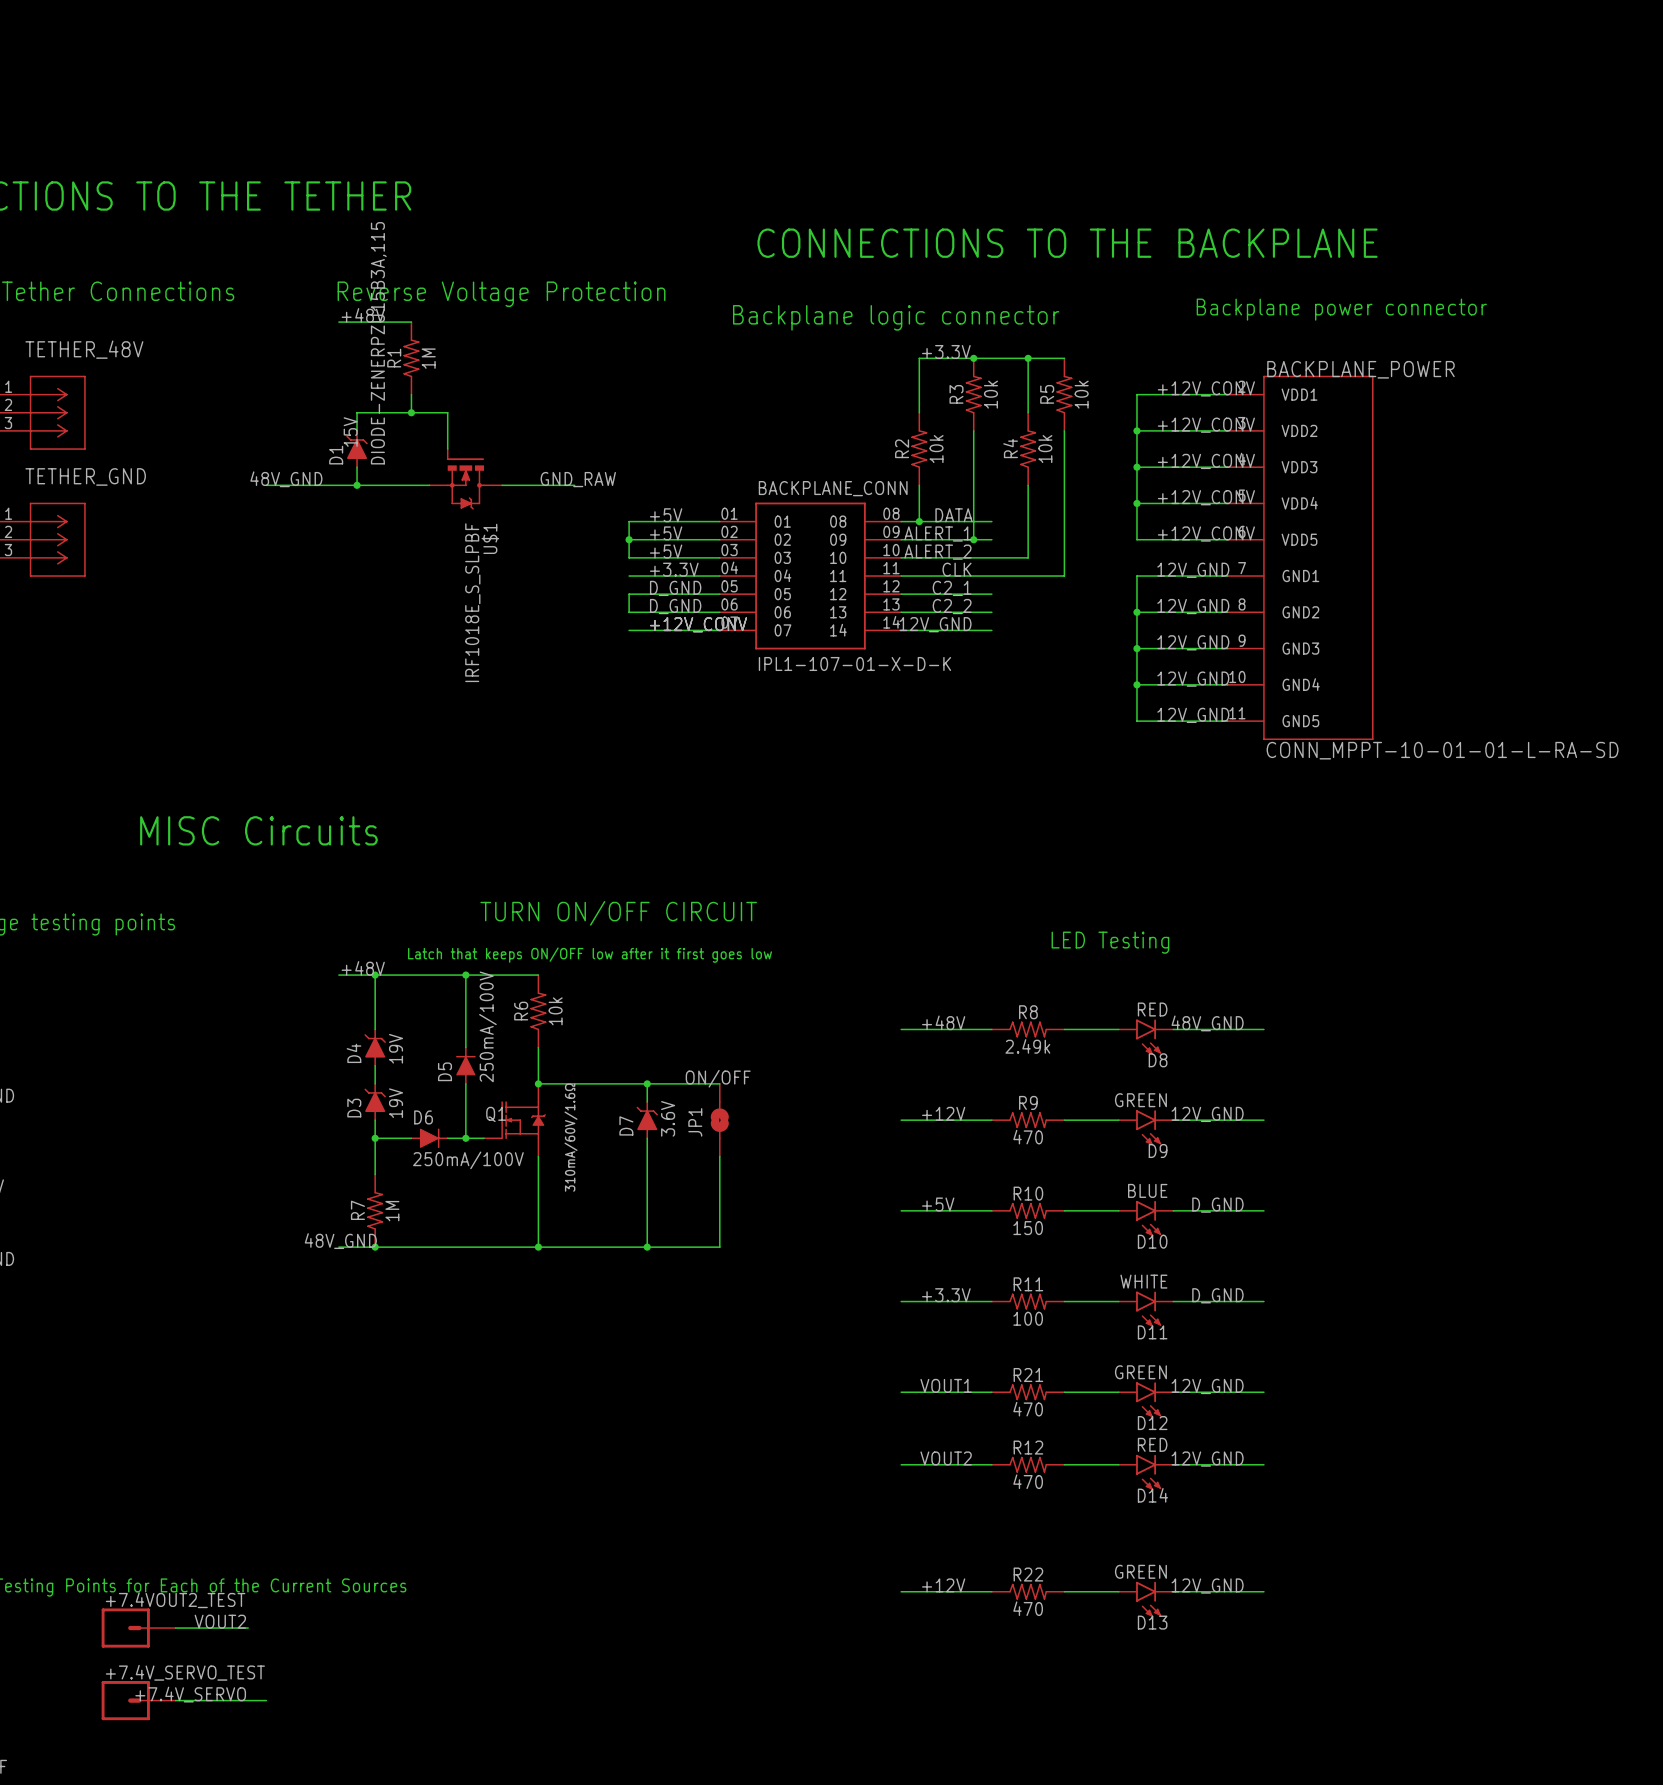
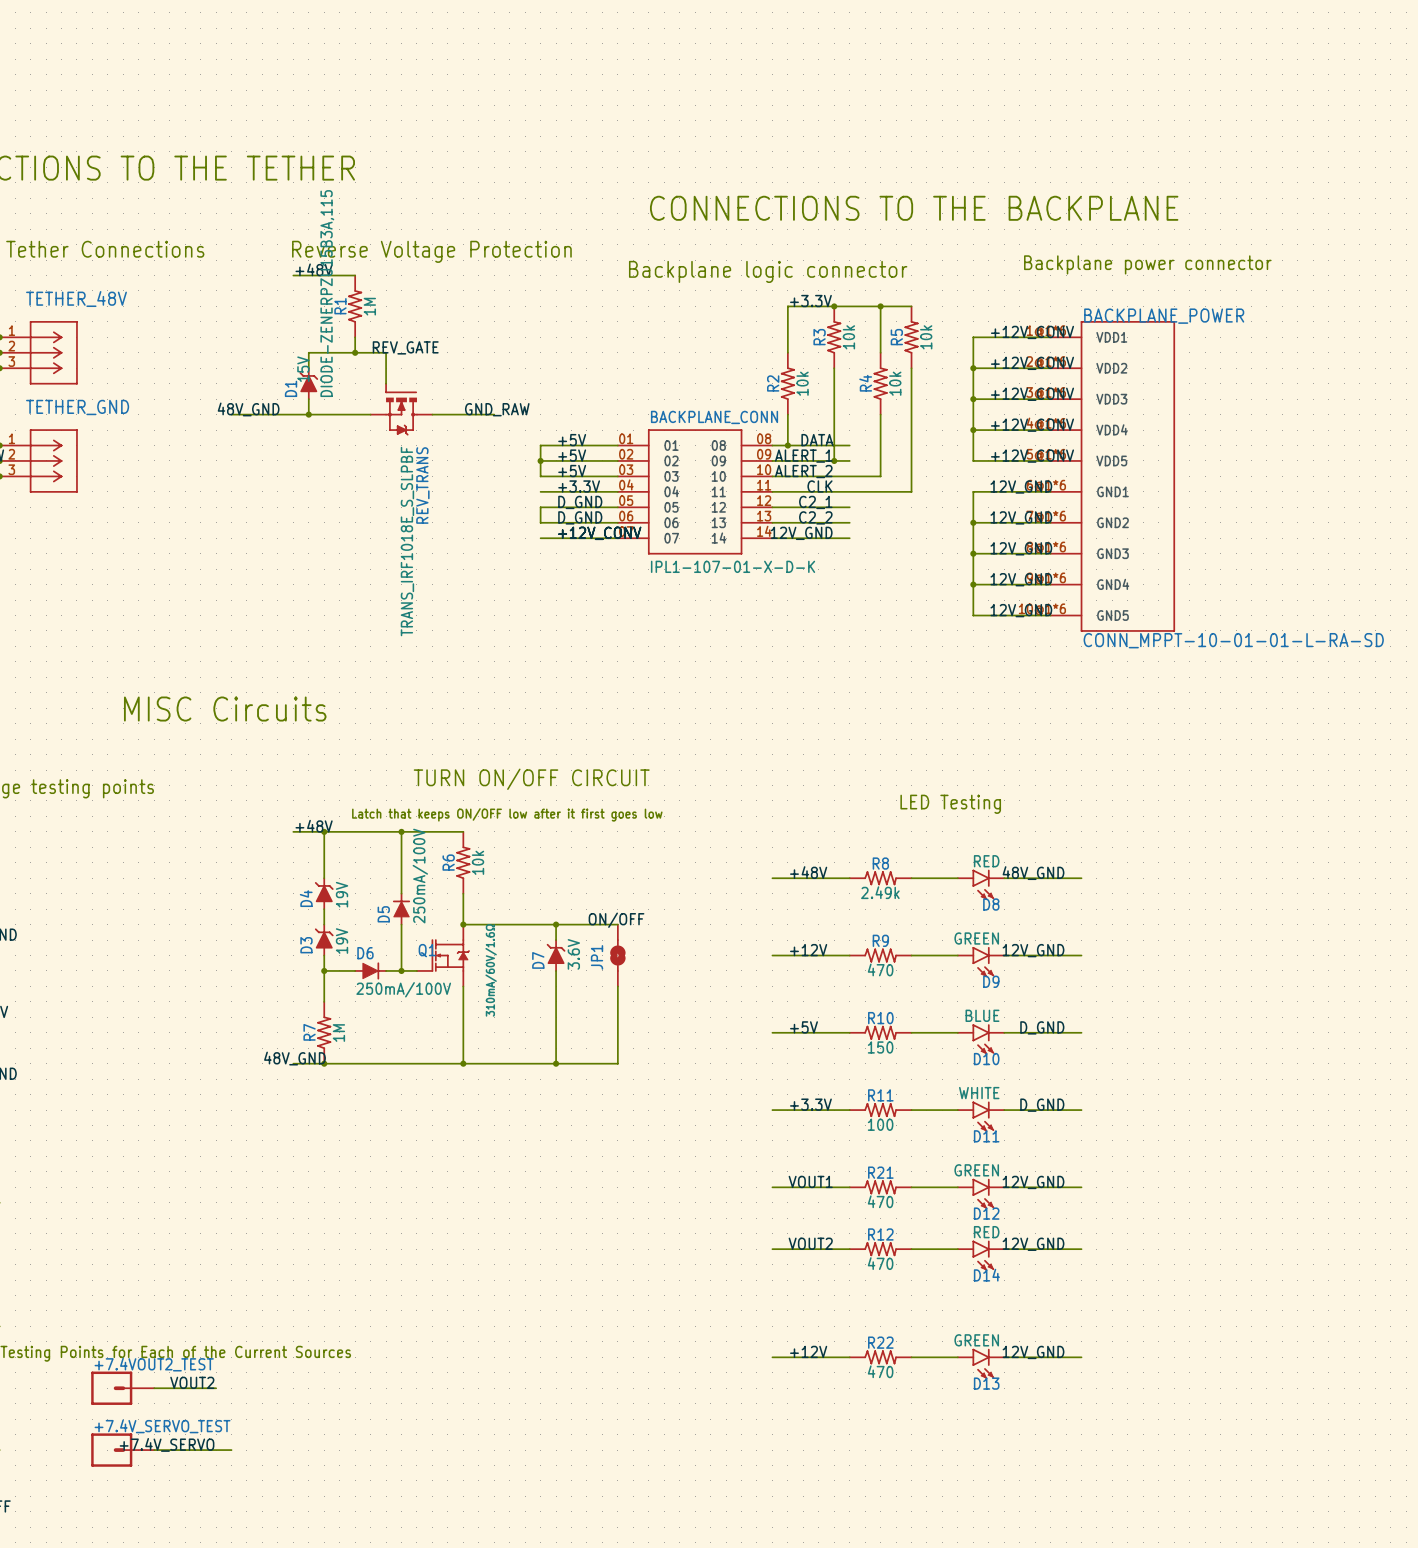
BACKPLANE_POWER symbol: [1227, 375, 1374, 740] -> [1050, 321, 1175, 632]
label: none -> REV_GATE (405, 347)
U$1 name: U$1 (490, 538) -> REV_TRANS (422, 485)
U$1 value: IRF1018E_S_SLPBF (472, 602) -> TRANS_IRF1018E_S_SLPBF (407, 541)

